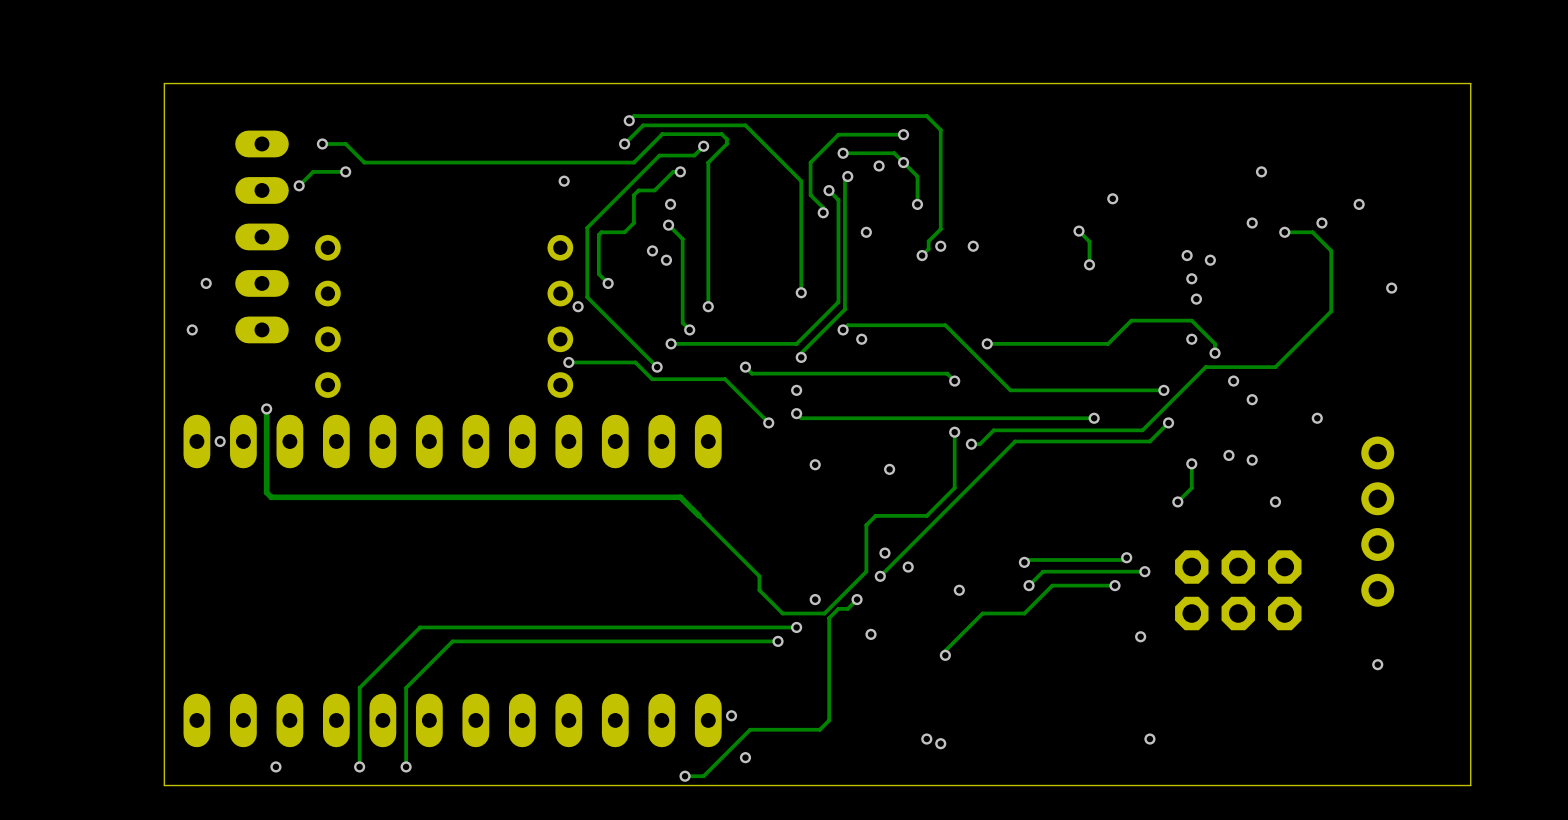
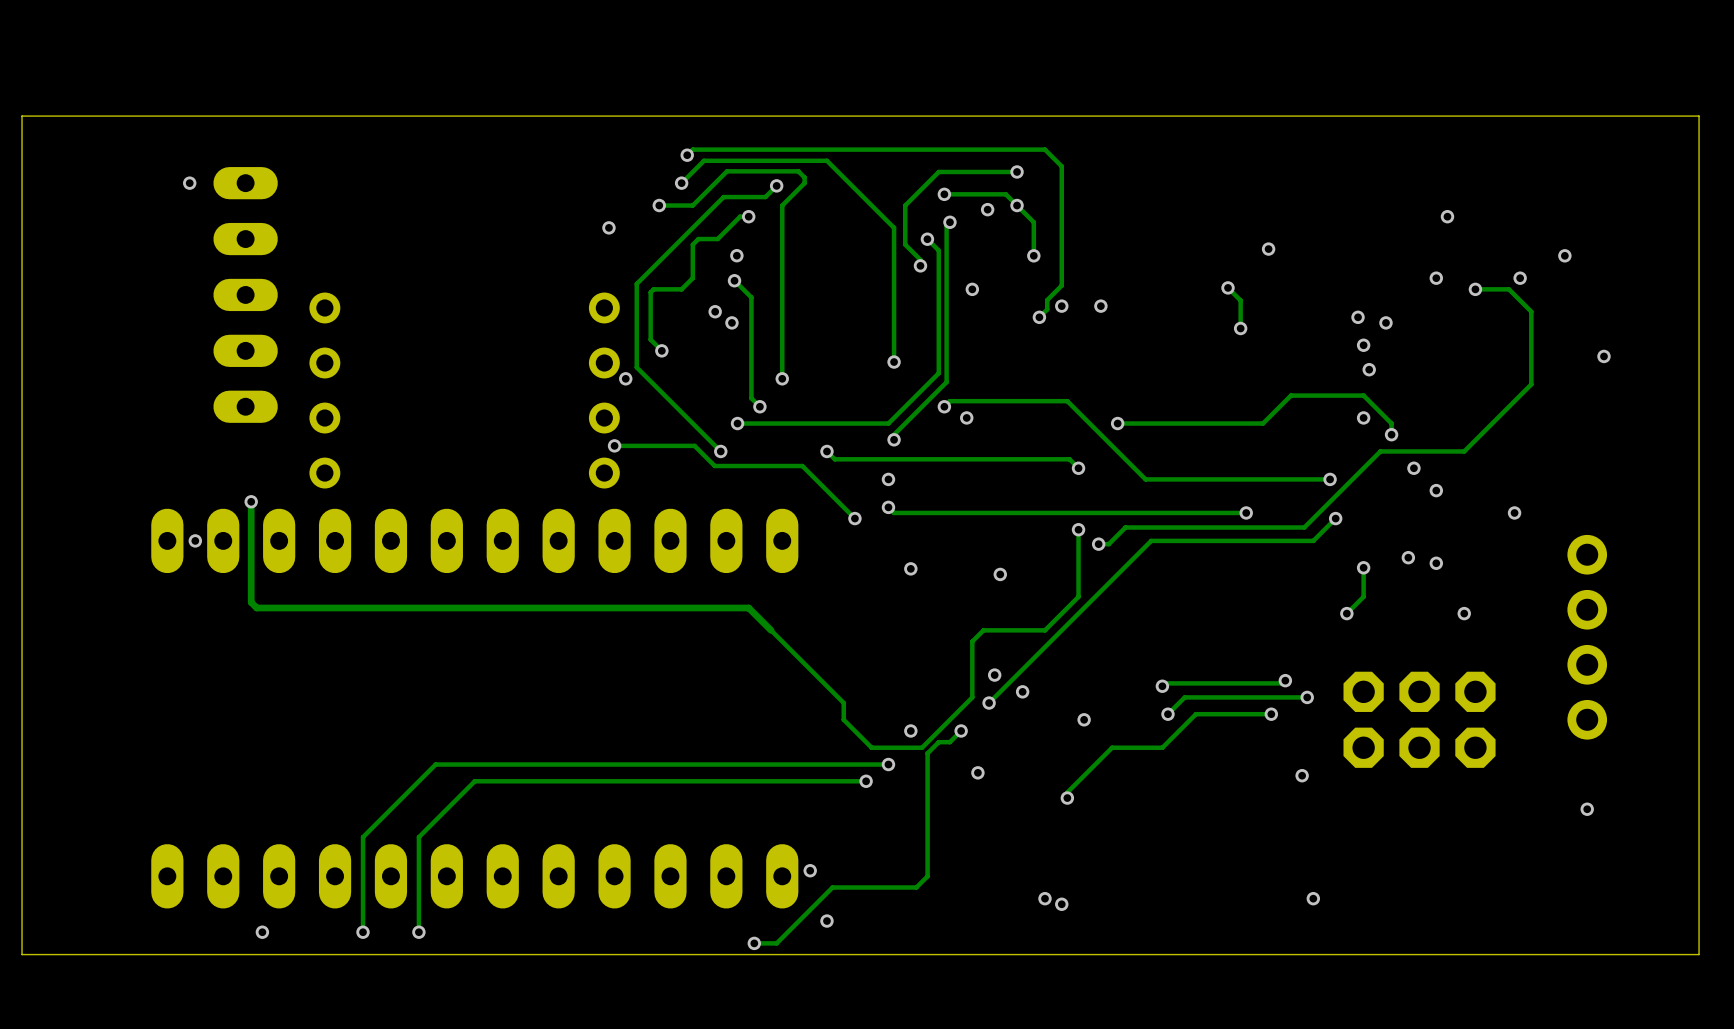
board edge: (1470, 88) (1470, 83) (164, 83) (164, 785) -> (1699, 116) (22, 116) (22, 954) (128, 954)
via: none -> (189, 183)
track: (322, 143) (345, 143) (364, 162) (606, 162) -> none
via: (322, 143) -> none
via: none -> (659, 205)
track: (345, 171) (313, 171) (299, 185) -> none
via: (345, 171) -> none
via: (299, 185) -> none
via: (206, 283) -> none
via: (192, 329) -> none

